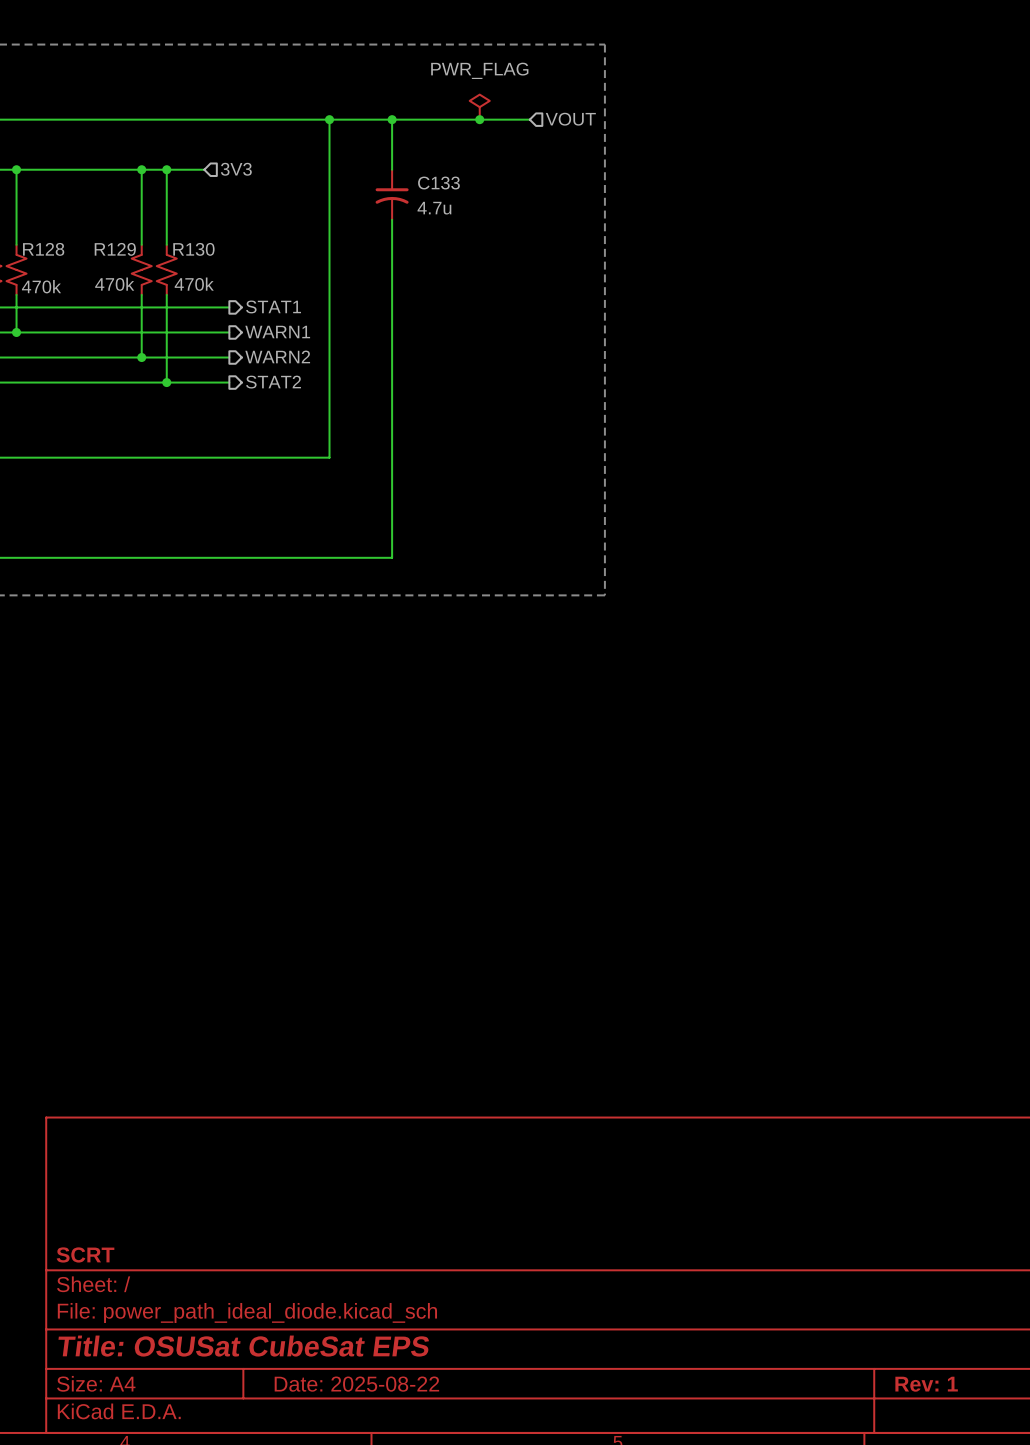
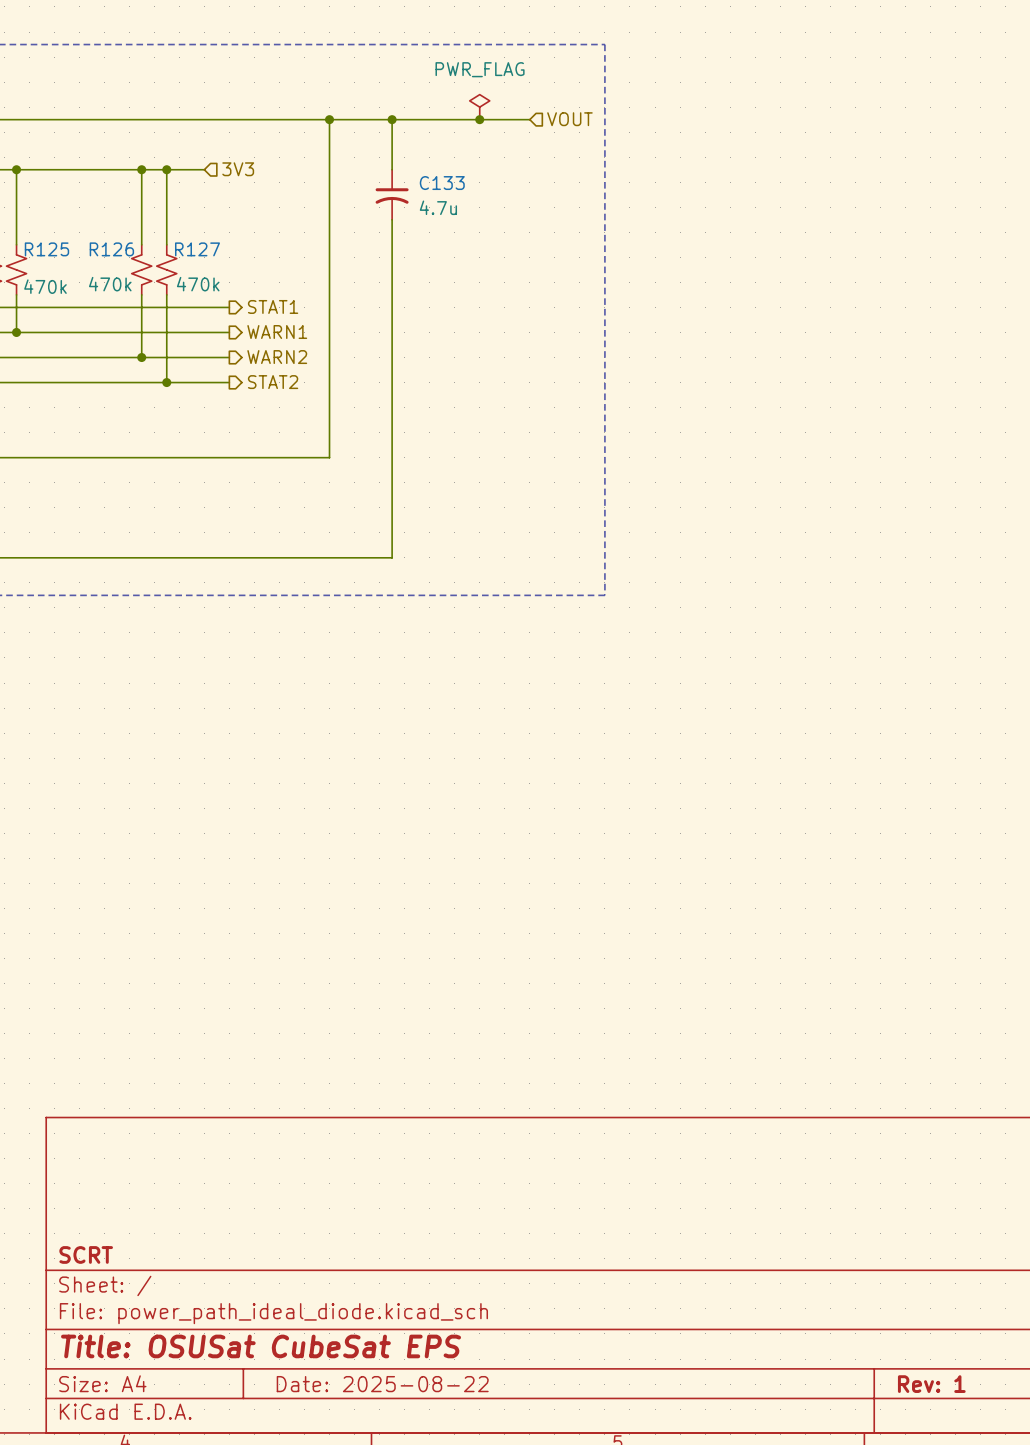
R128 name: R128 (43, 249) -> R125 (46, 249)
R129 name: R129 (115, 249) -> R126 (111, 249)
R130 name: R130 (193, 249) -> R127 (197, 249)

